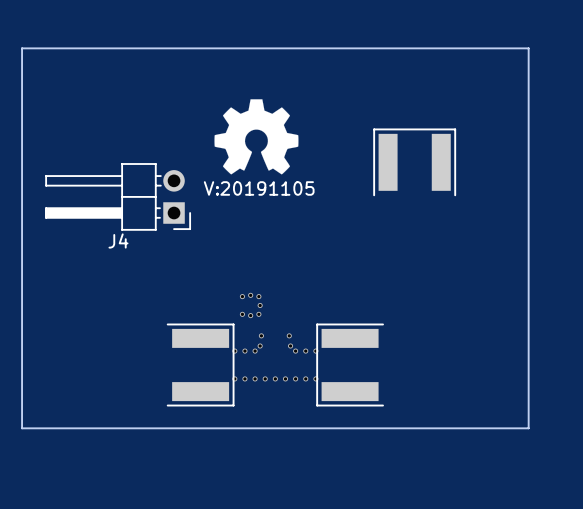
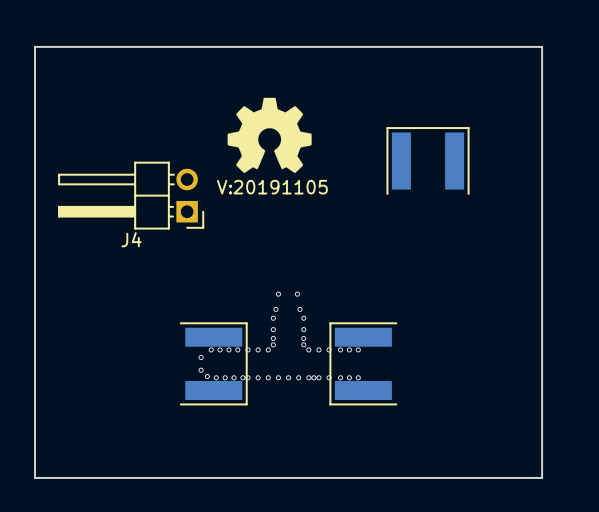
via: (250, 295) -> none
via: none -> (278, 294)
via: none -> (297, 294)
via: (242, 296) -> none
via: (258, 296) -> none
via: (260, 305) -> none
via: none -> (275, 309)
via: none -> (299, 309)
via: (242, 314) -> none
via: (258, 314) -> none
via: (250, 315) -> none
via: none -> (273, 318)
via: none -> (303, 318)
via: none -> (273, 329)
via: none -> (303, 329)
via: (261, 335) -> none
via: (289, 335) -> none
via: none -> (273, 338)
via: none -> (303, 338)
via: none -> (211, 349)
via: none -> (220, 349)
via: none -> (228, 349)
via: none -> (237, 349)
via: none -> (340, 349)
via: none -> (349, 349)
via: none -> (358, 349)
via: none -> (201, 357)
via: none -> (201, 370)
via: none -> (207, 376)
via: none -> (216, 377)
via: none -> (225, 377)
via: none -> (234, 377)
via: none -> (242, 377)
via: none -> (313, 377)
via: none -> (340, 377)
via: none -> (349, 377)
via: none -> (358, 377)
board edge: (528, 428) (22, 428) -> (542, 427) (542, 477) (34, 477) (34, 427)

